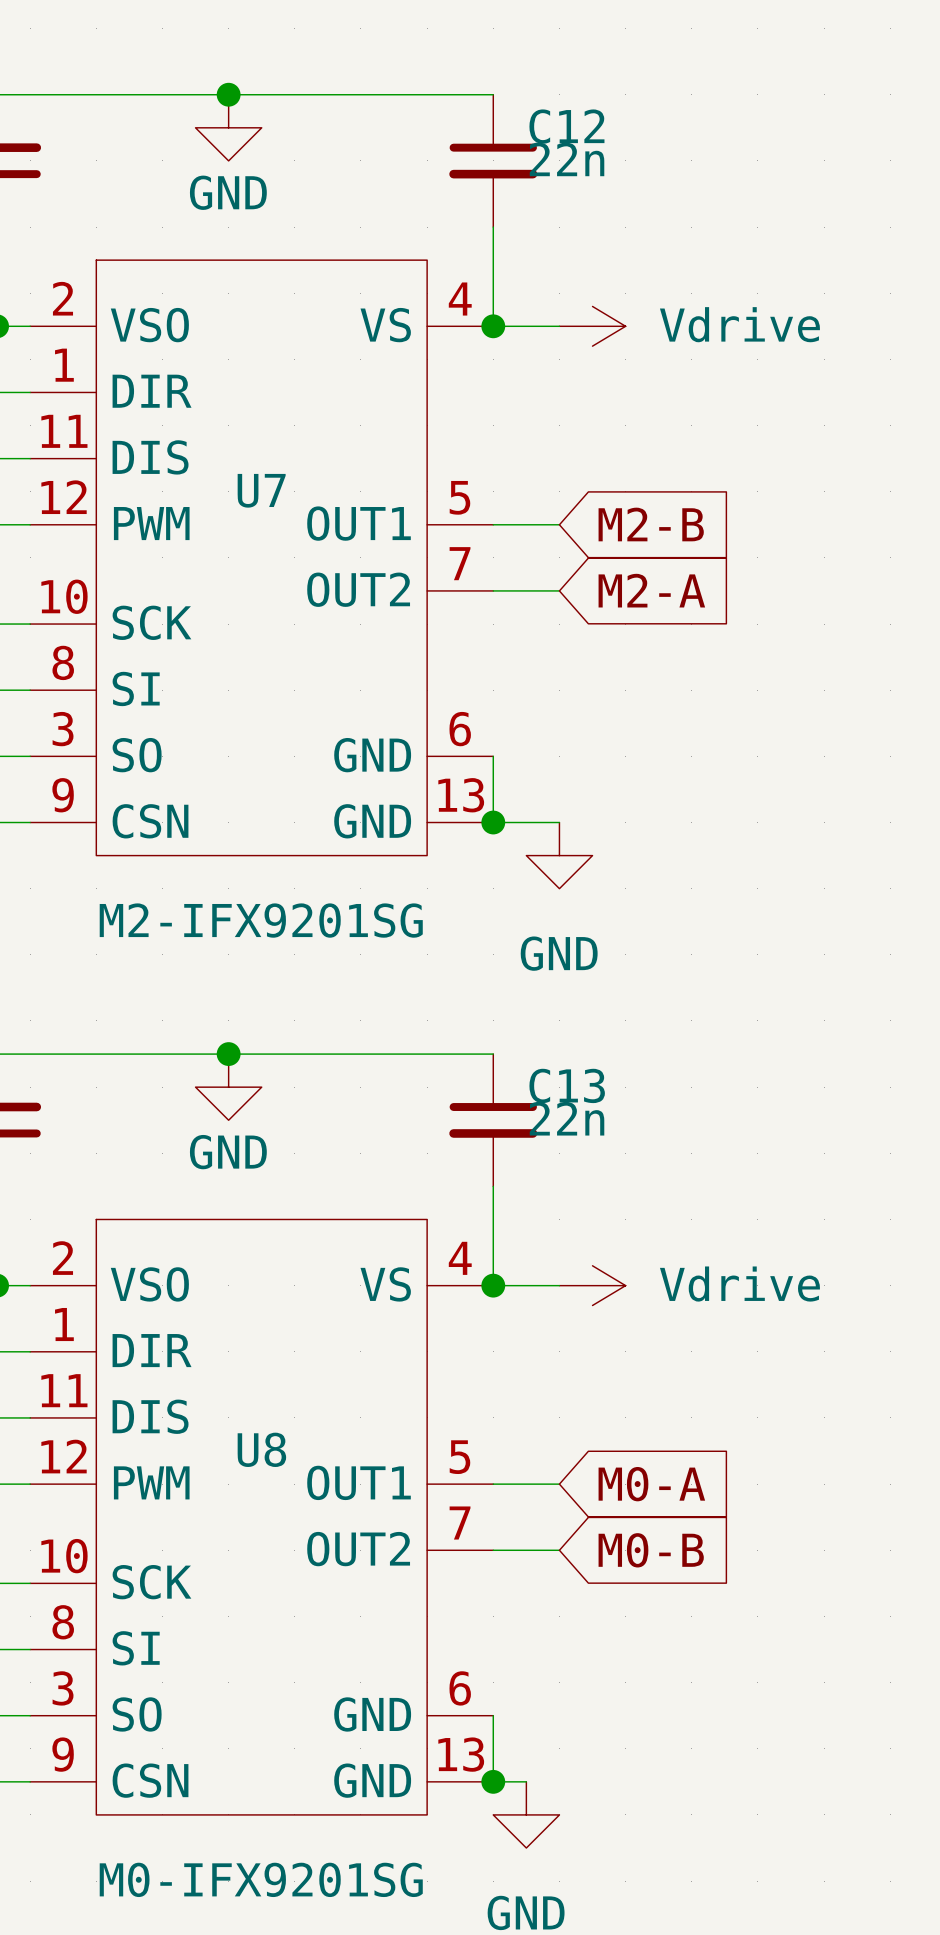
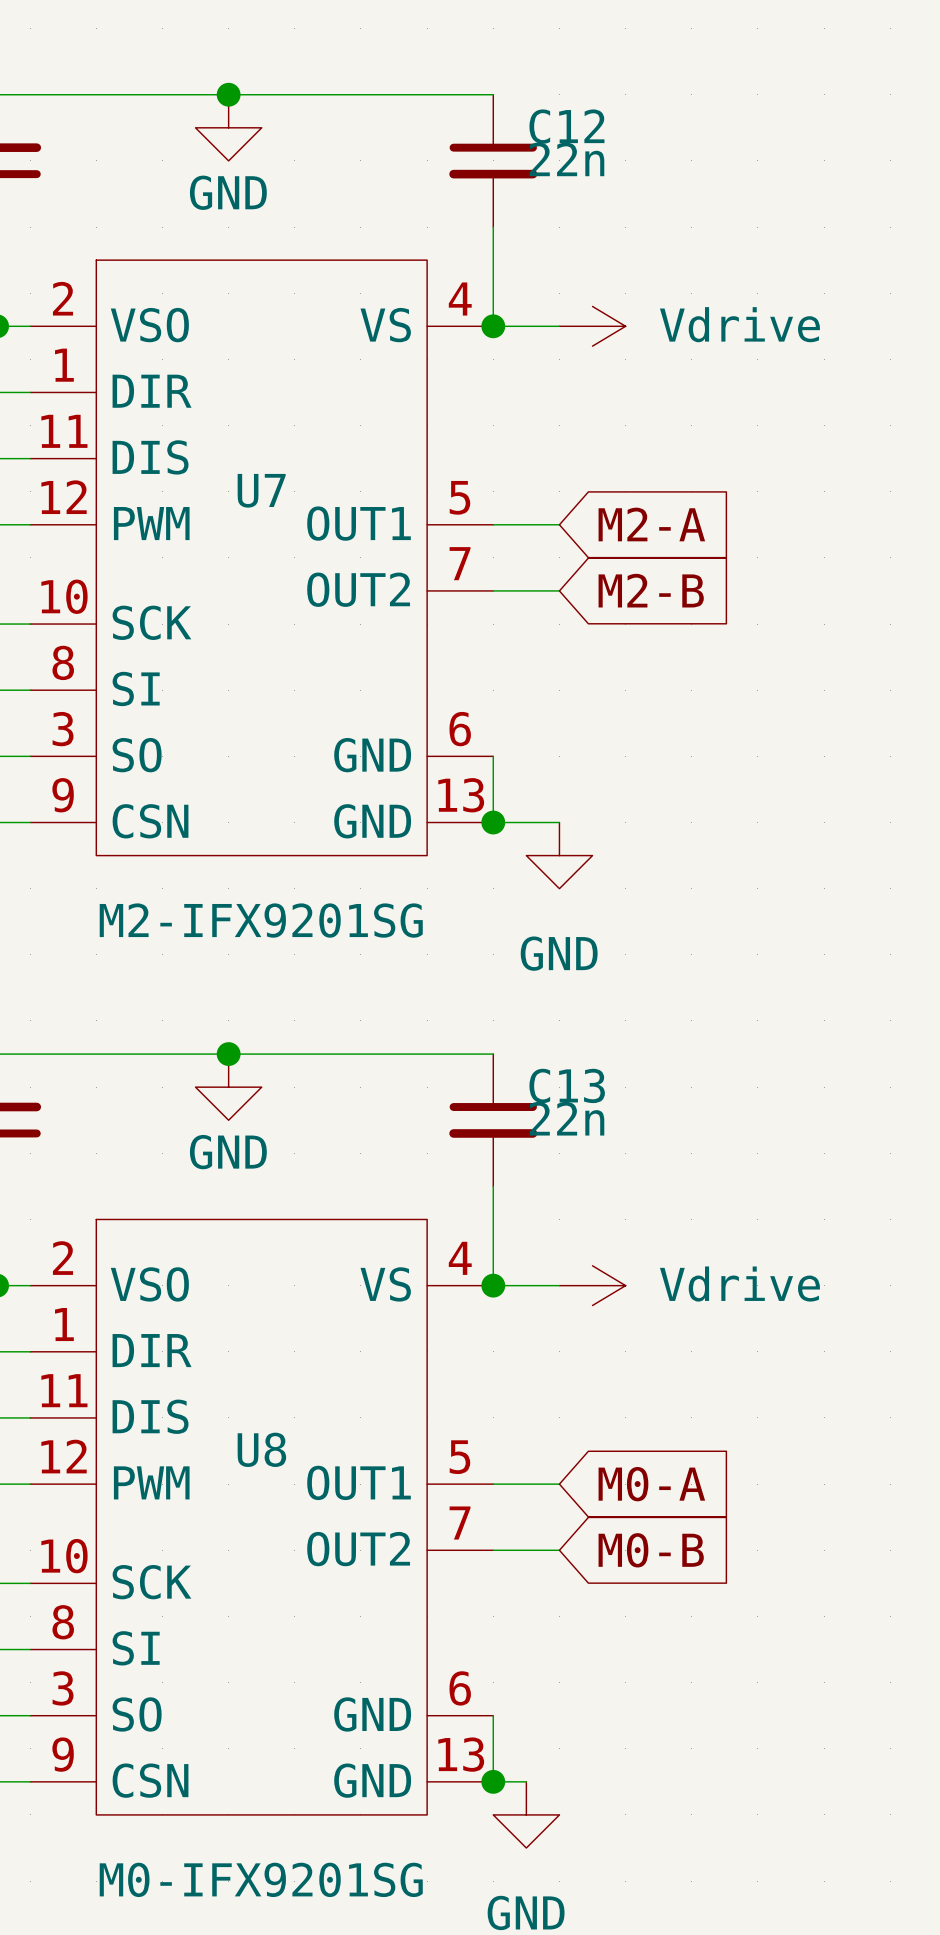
global label: M2-B (651, 524) -> M2-A (651, 524)
global label: M2-A (651, 590) -> M2-B (651, 590)

